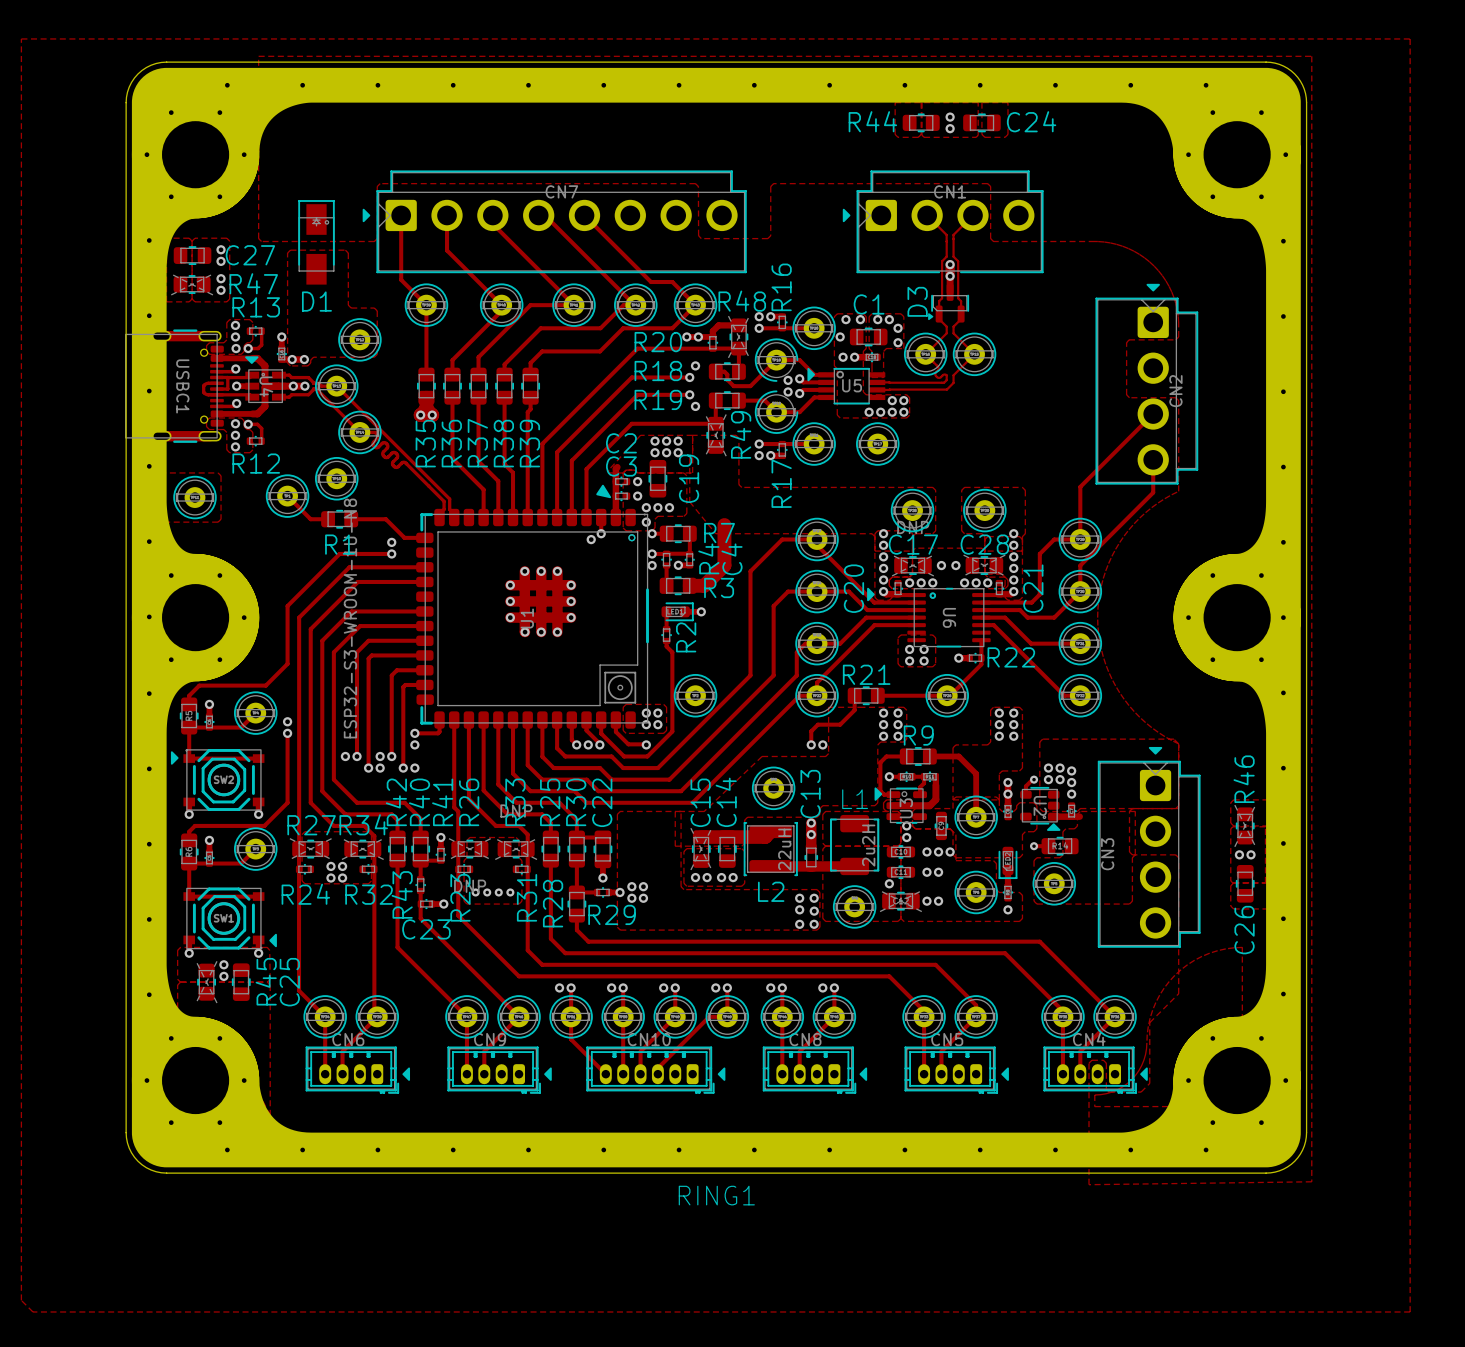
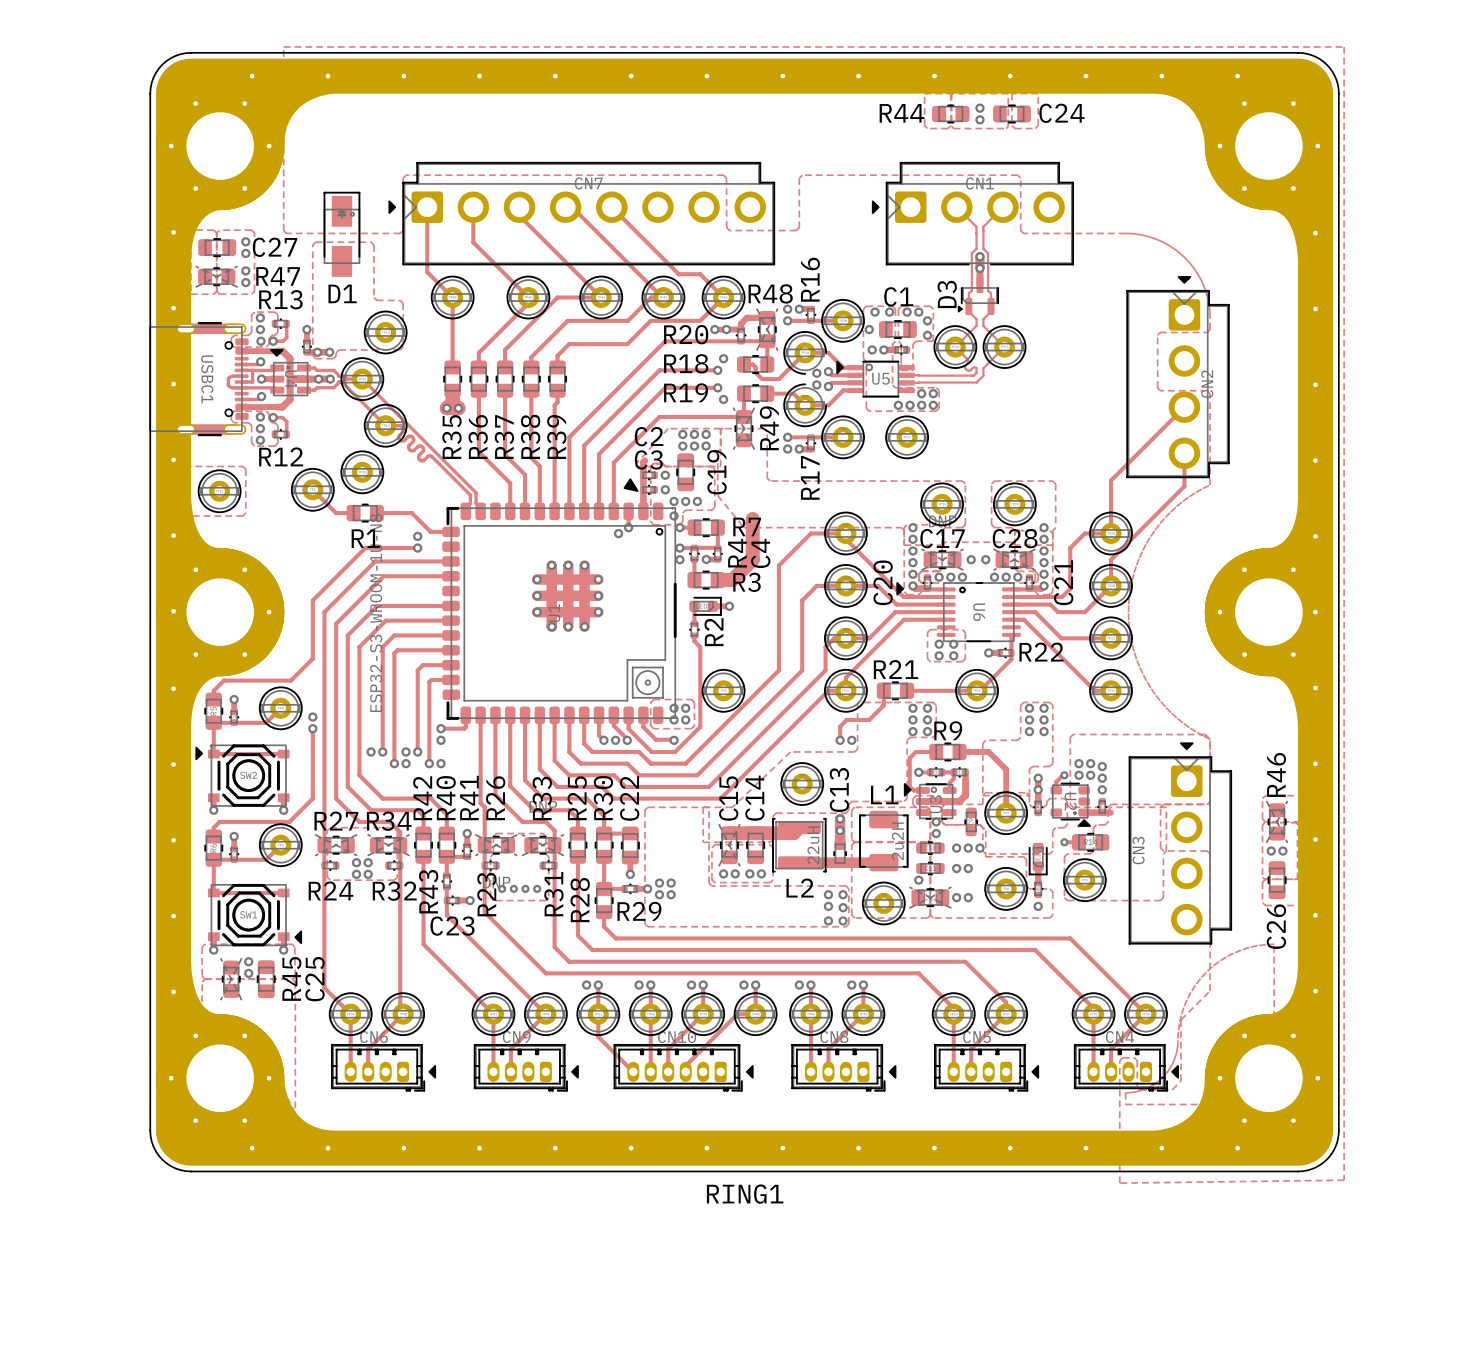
zone outline: (21, 38) (1410, 38) (1410, 1311) (32, 1311) (21, 1300) (21, 38) -> none

